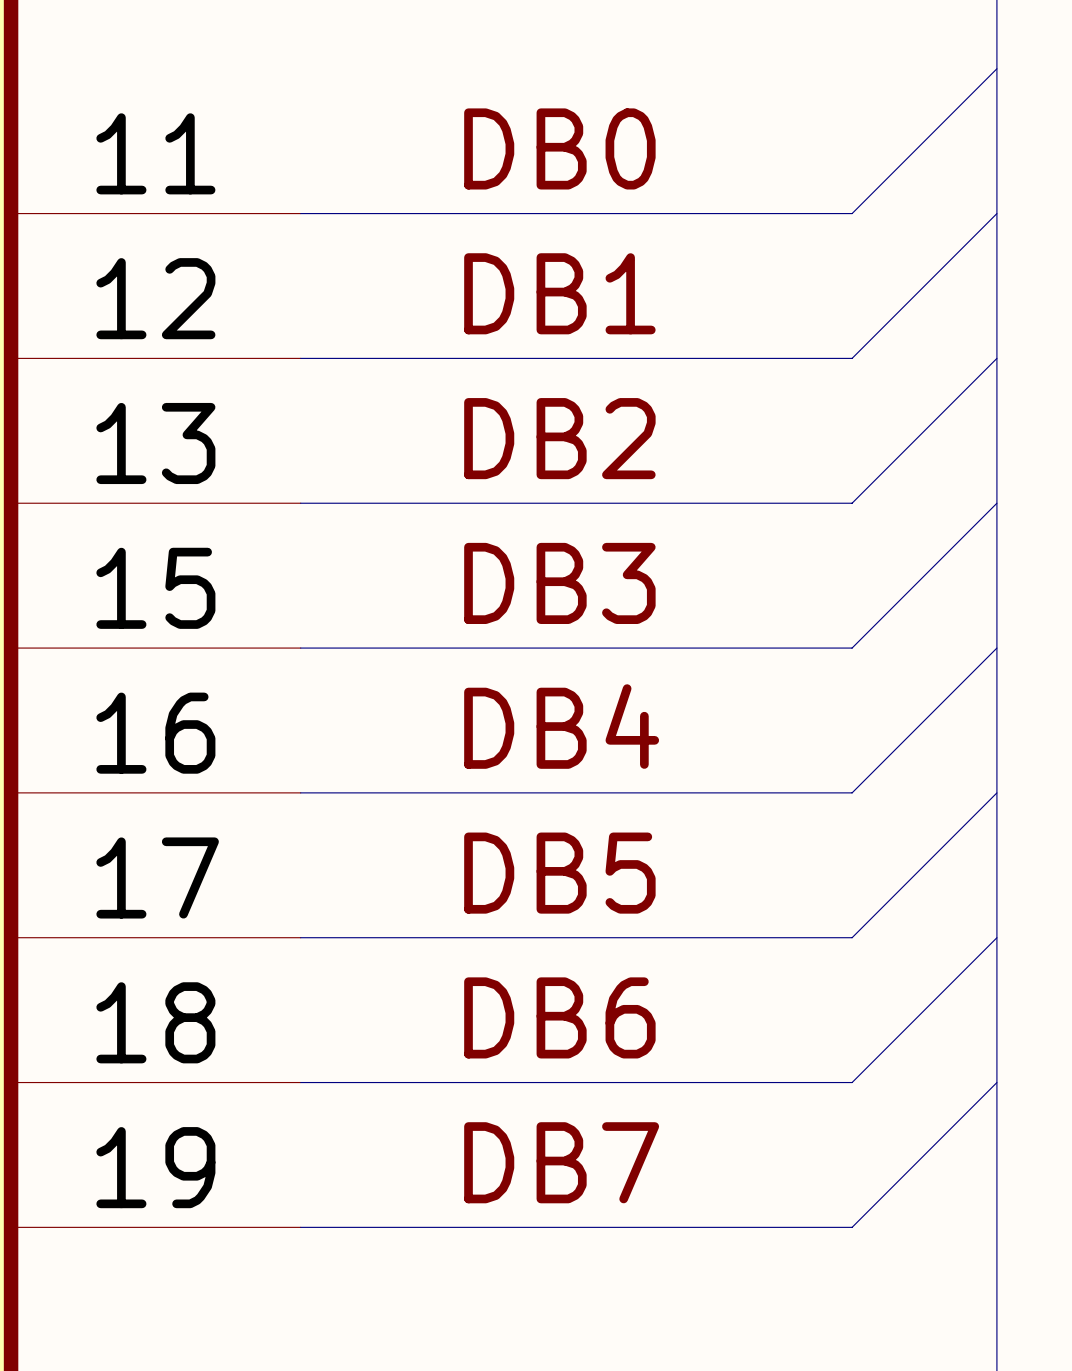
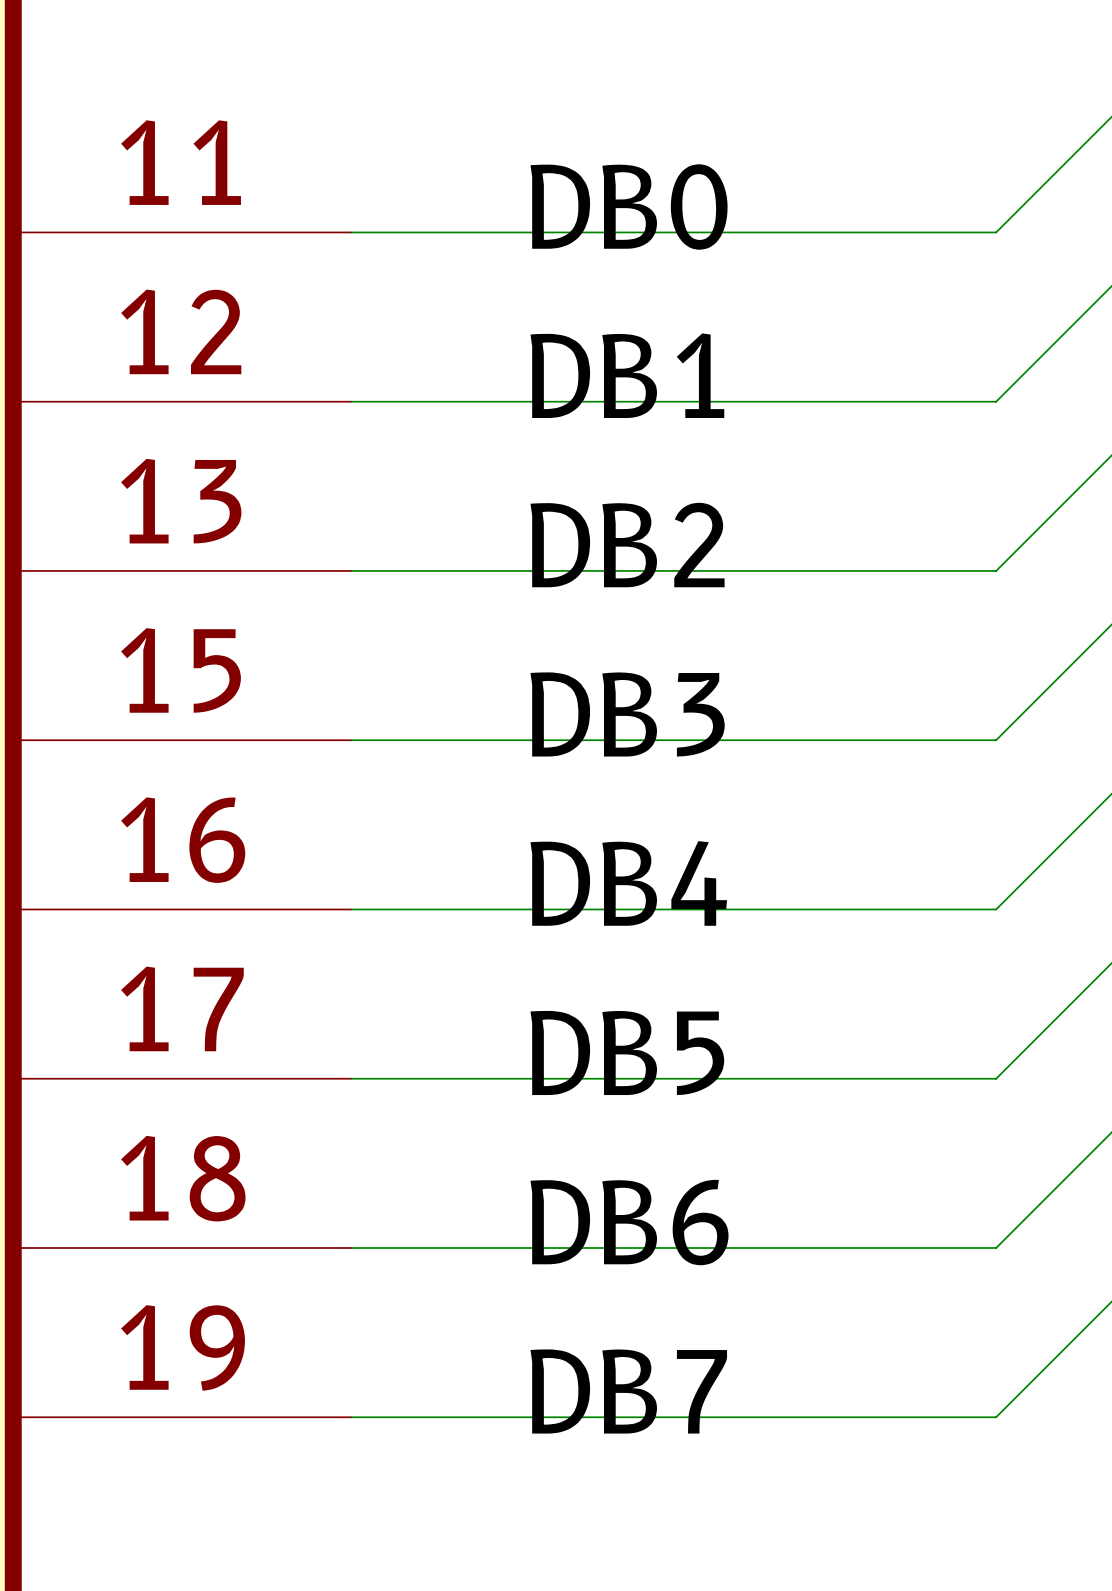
label position: DB0 (559, 148) -> DB0 (629, 206)
label position: DB1 (559, 293) -> DB1 (627, 375)
label position: DB2 (559, 438) -> DB2 (627, 545)
label position: DB3 (559, 583) -> DB3 (627, 714)
label position: DB4 (561, 726) -> DB4 (628, 883)
label position: DB5 (559, 873) -> DB5 (627, 1052)
label position: DB6 (559, 1017) -> DB6 (629, 1222)
label position: DB7 (561, 1162) -> DB7 (628, 1391)

